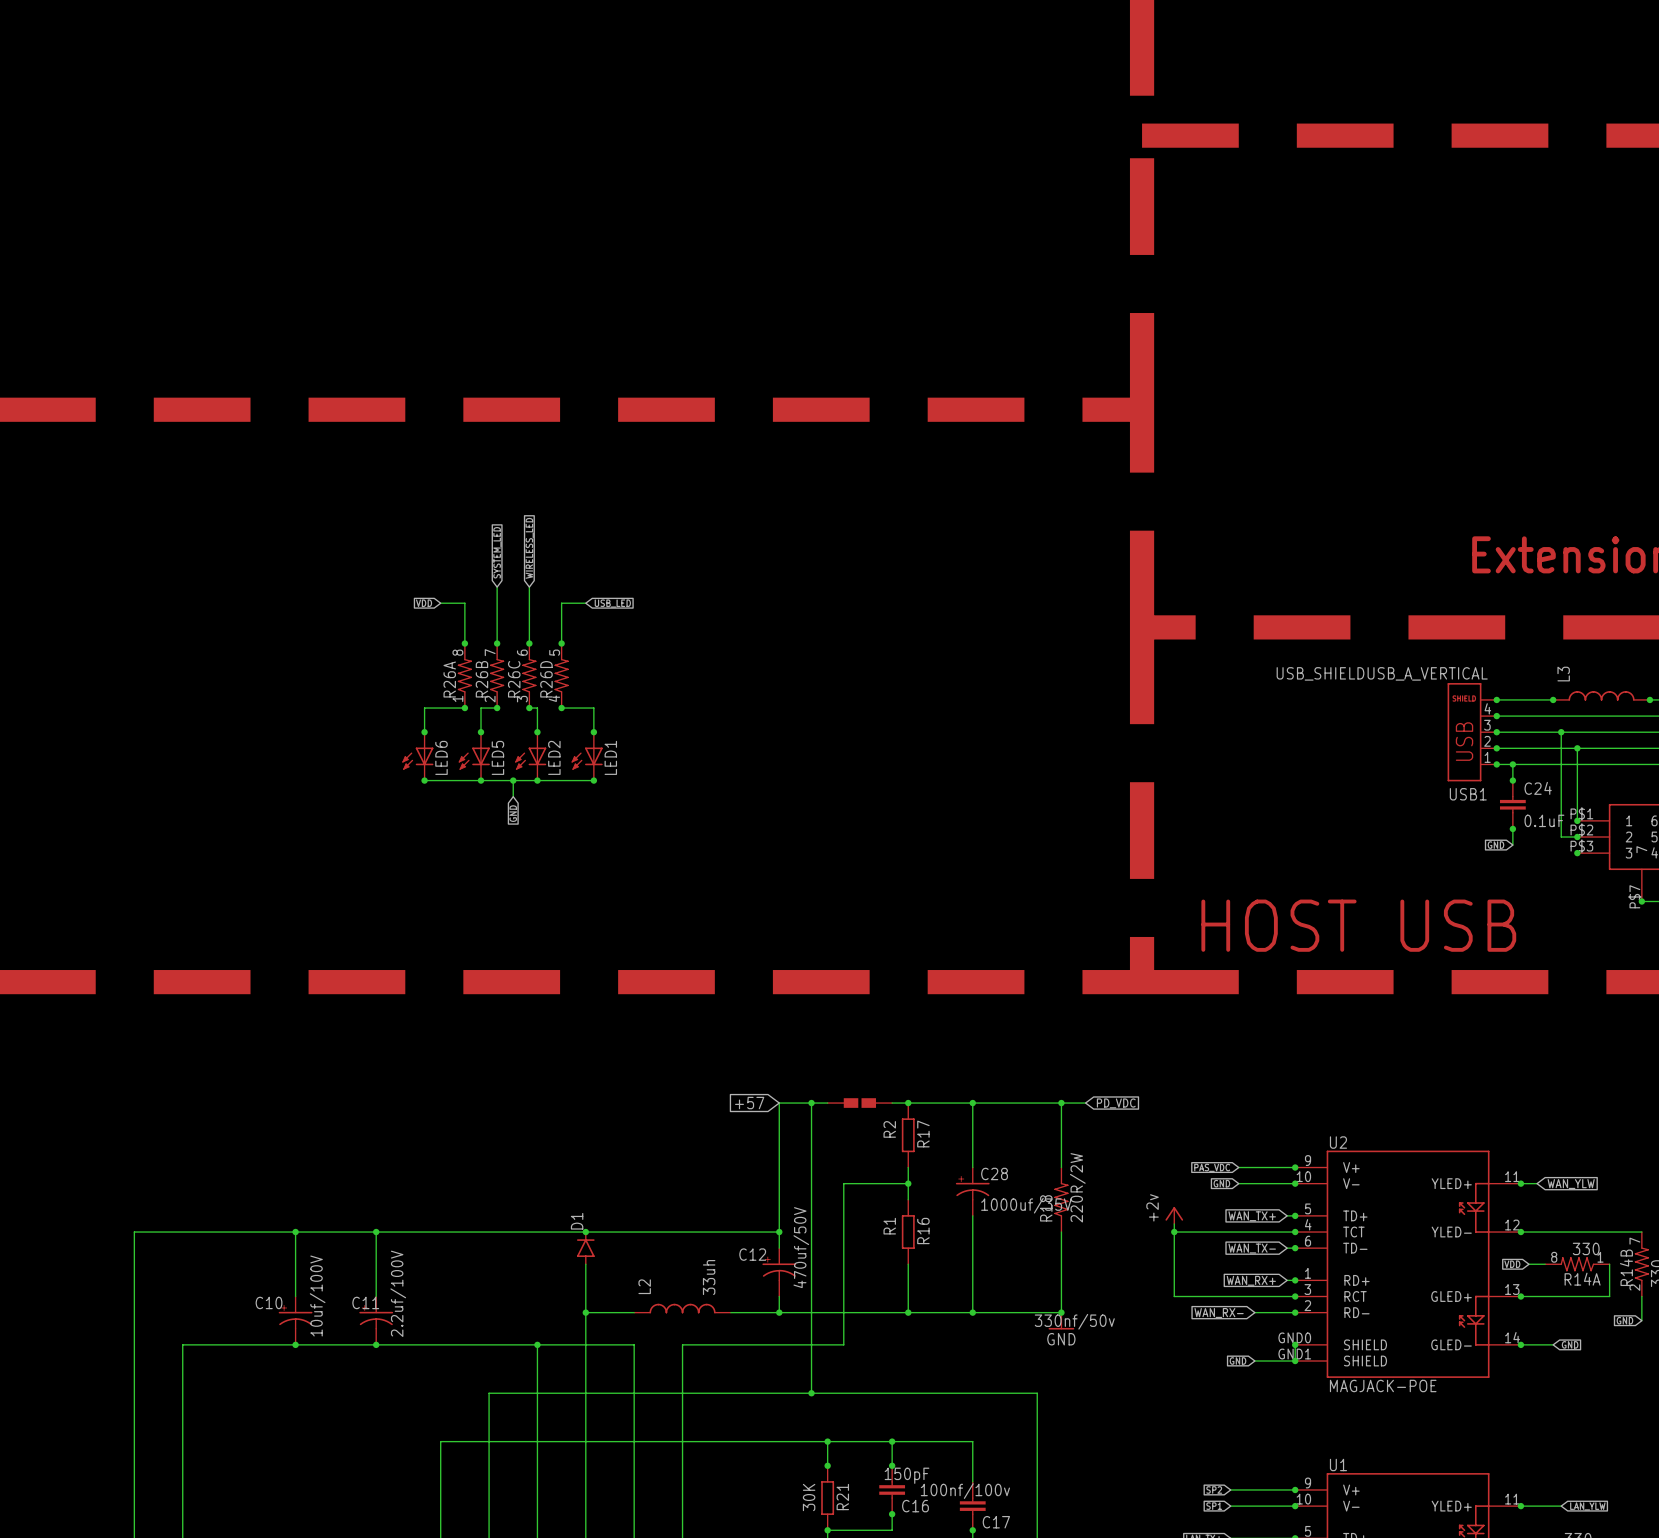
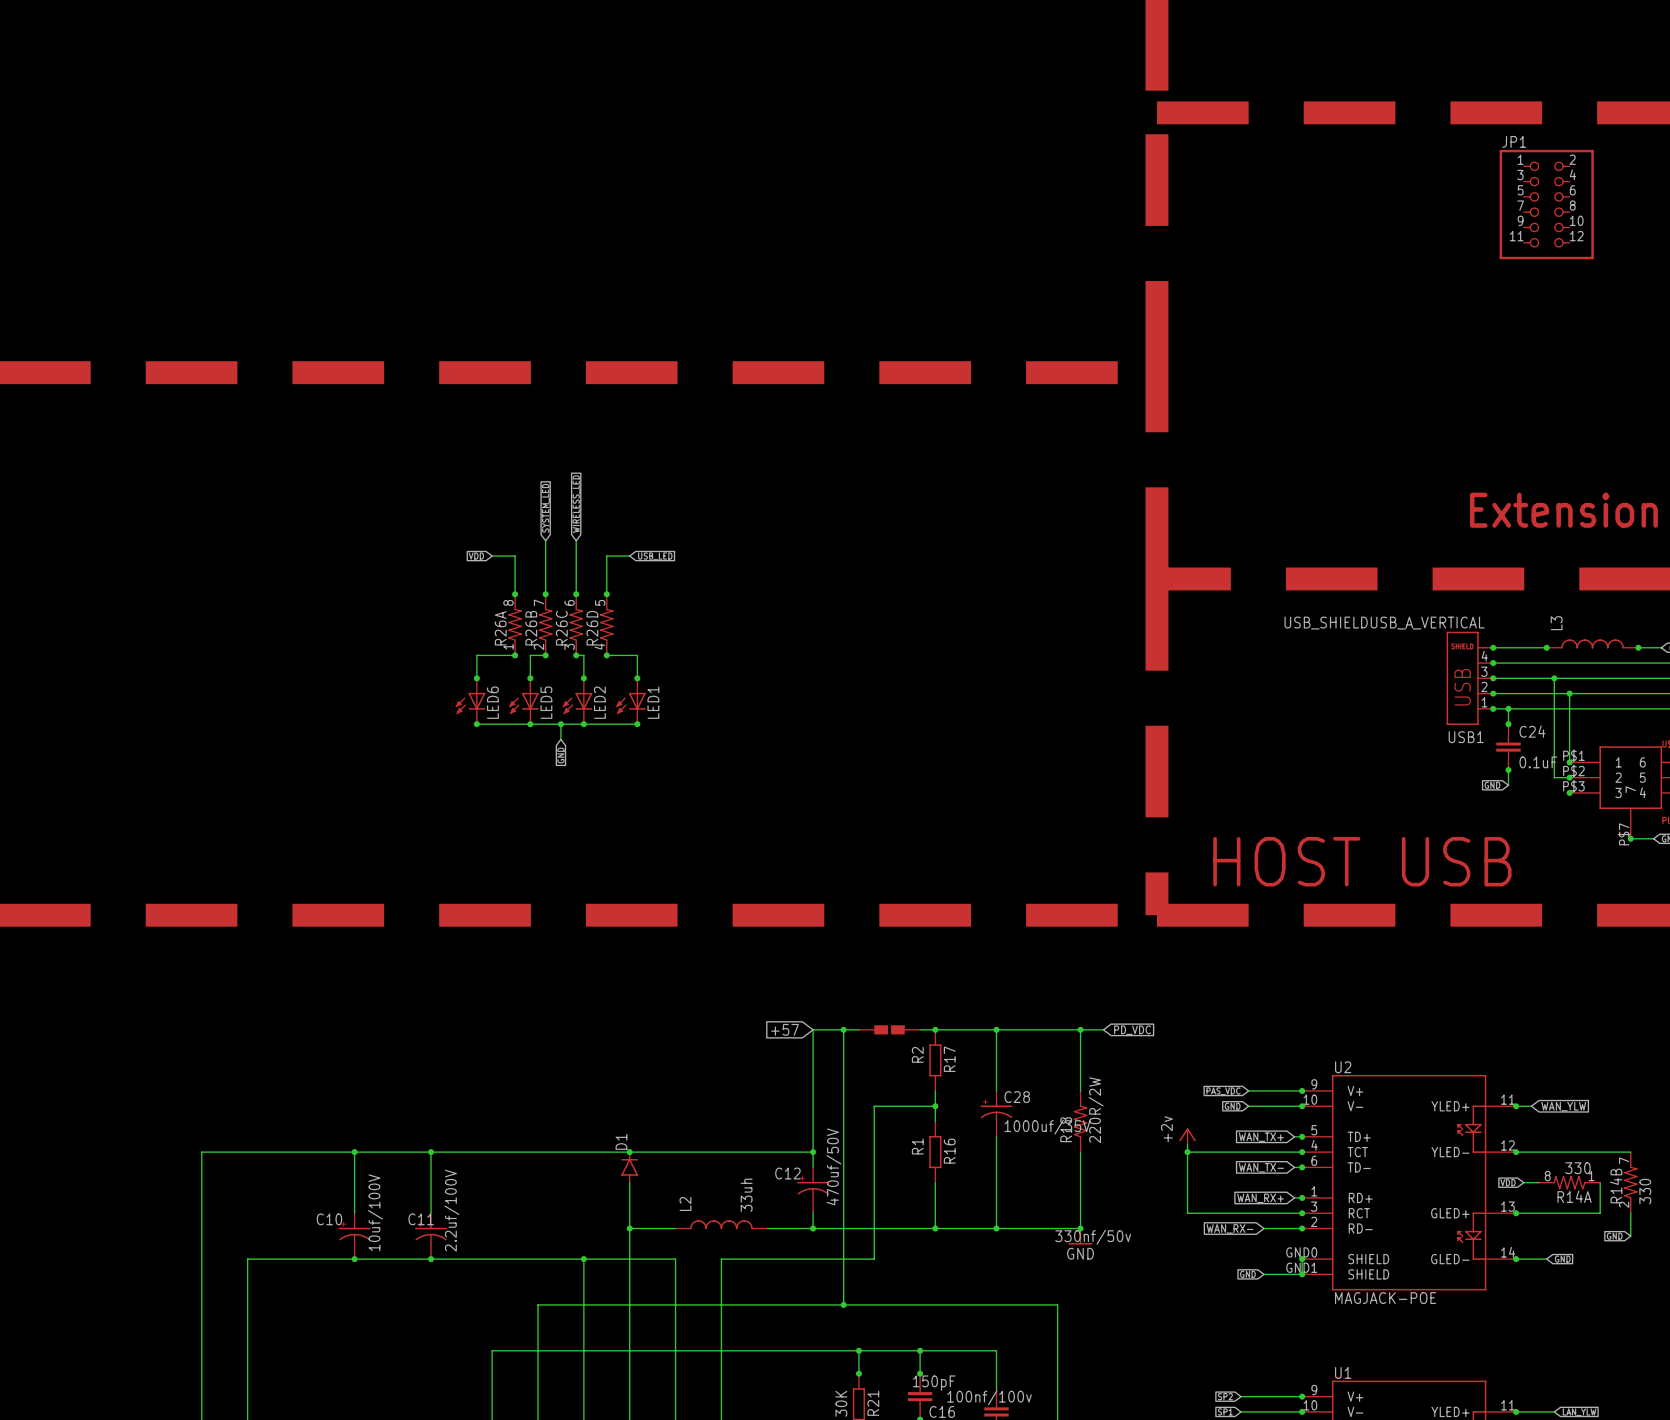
JP1: none -> (1546, 204)

